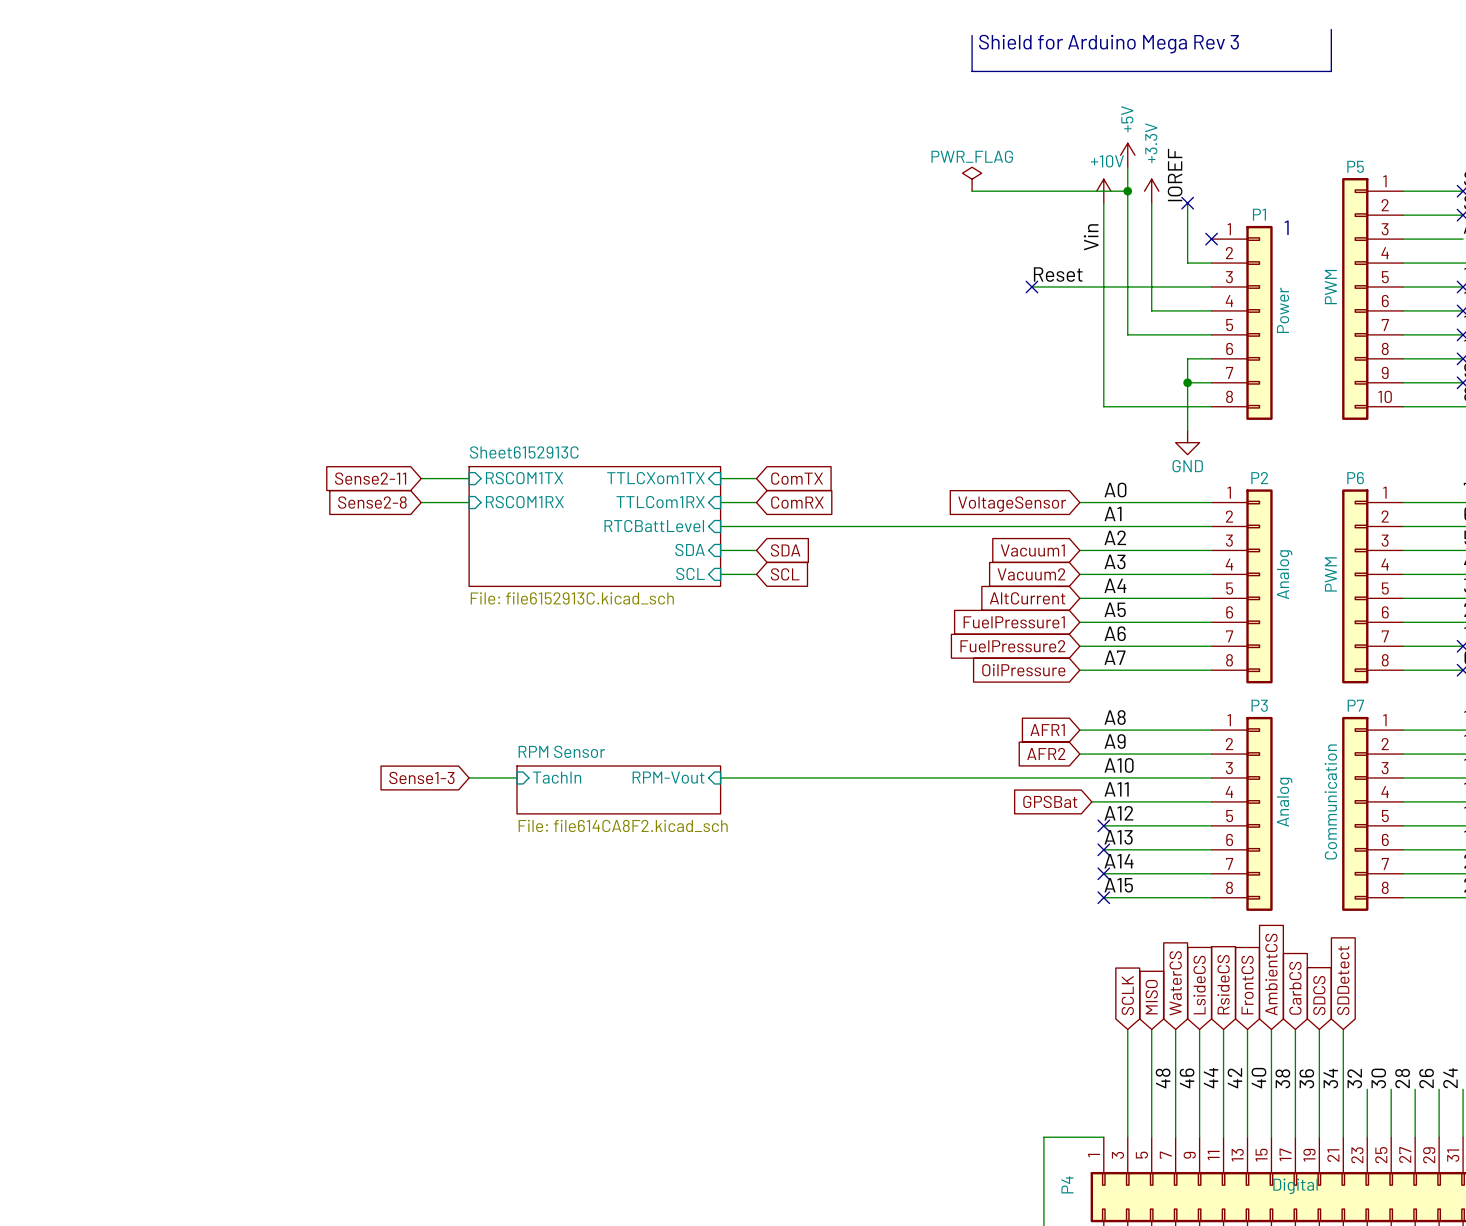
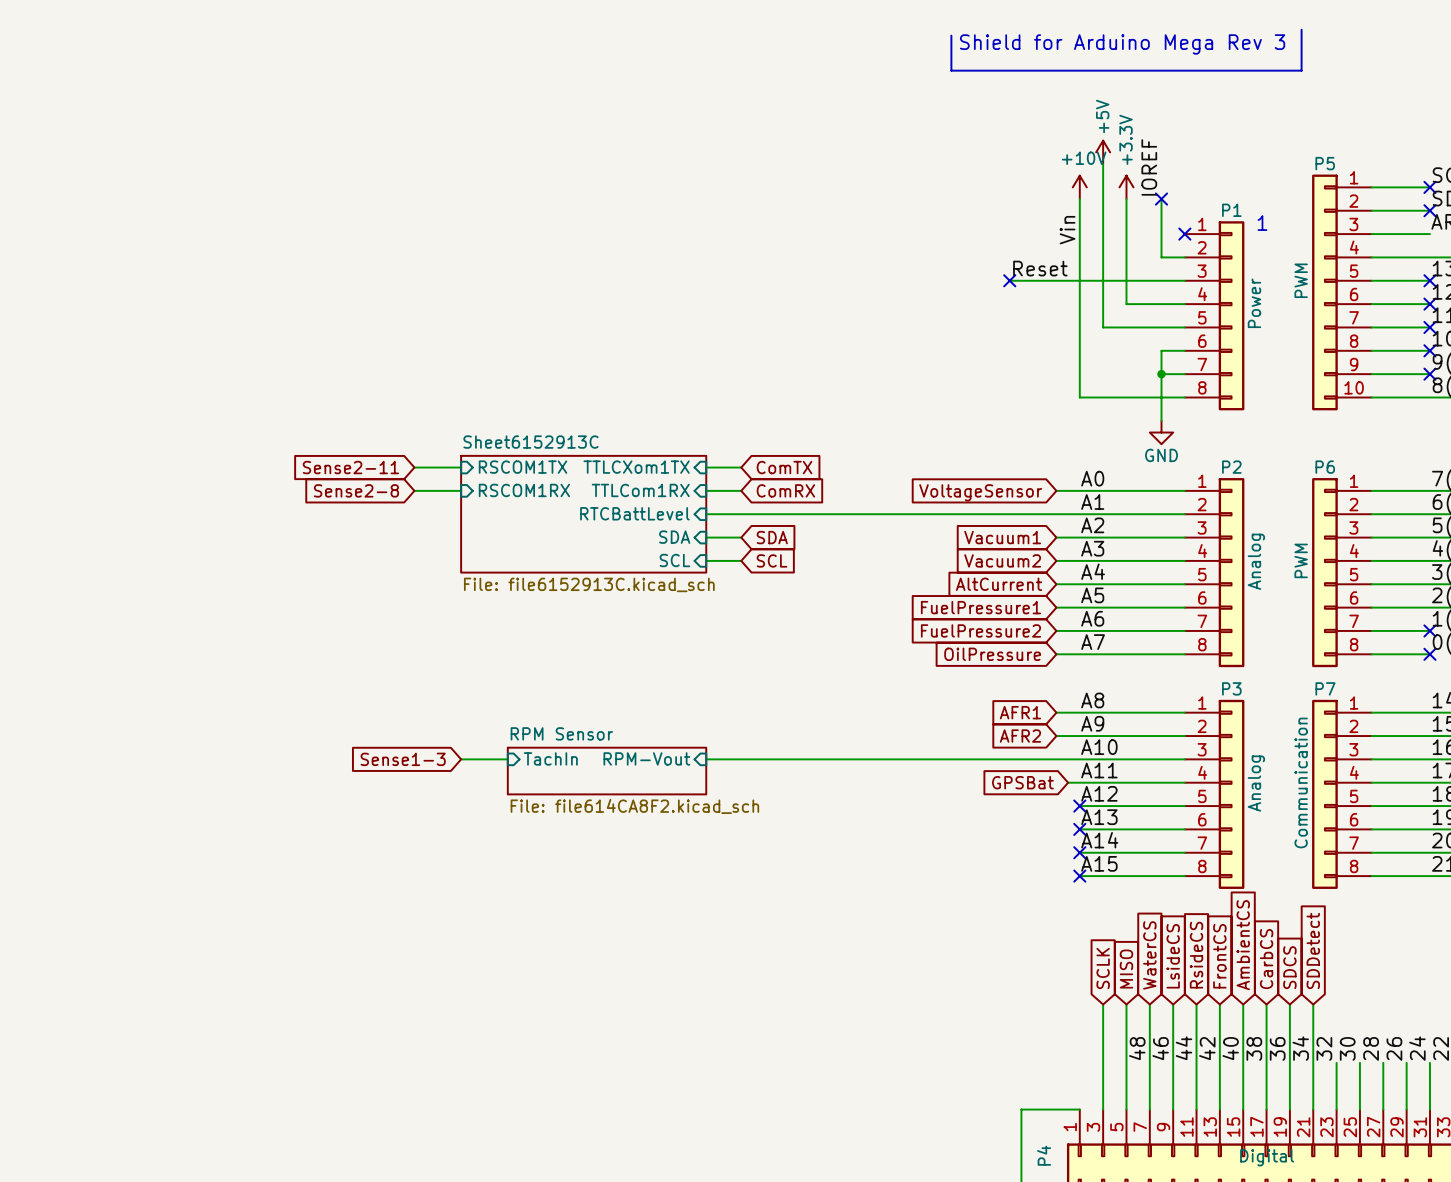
power symbol: PWR_FLAG (972, 179) -> none
wire: (972, 191) (1127, 191) -> none
junction: (1127, 191) -> none

